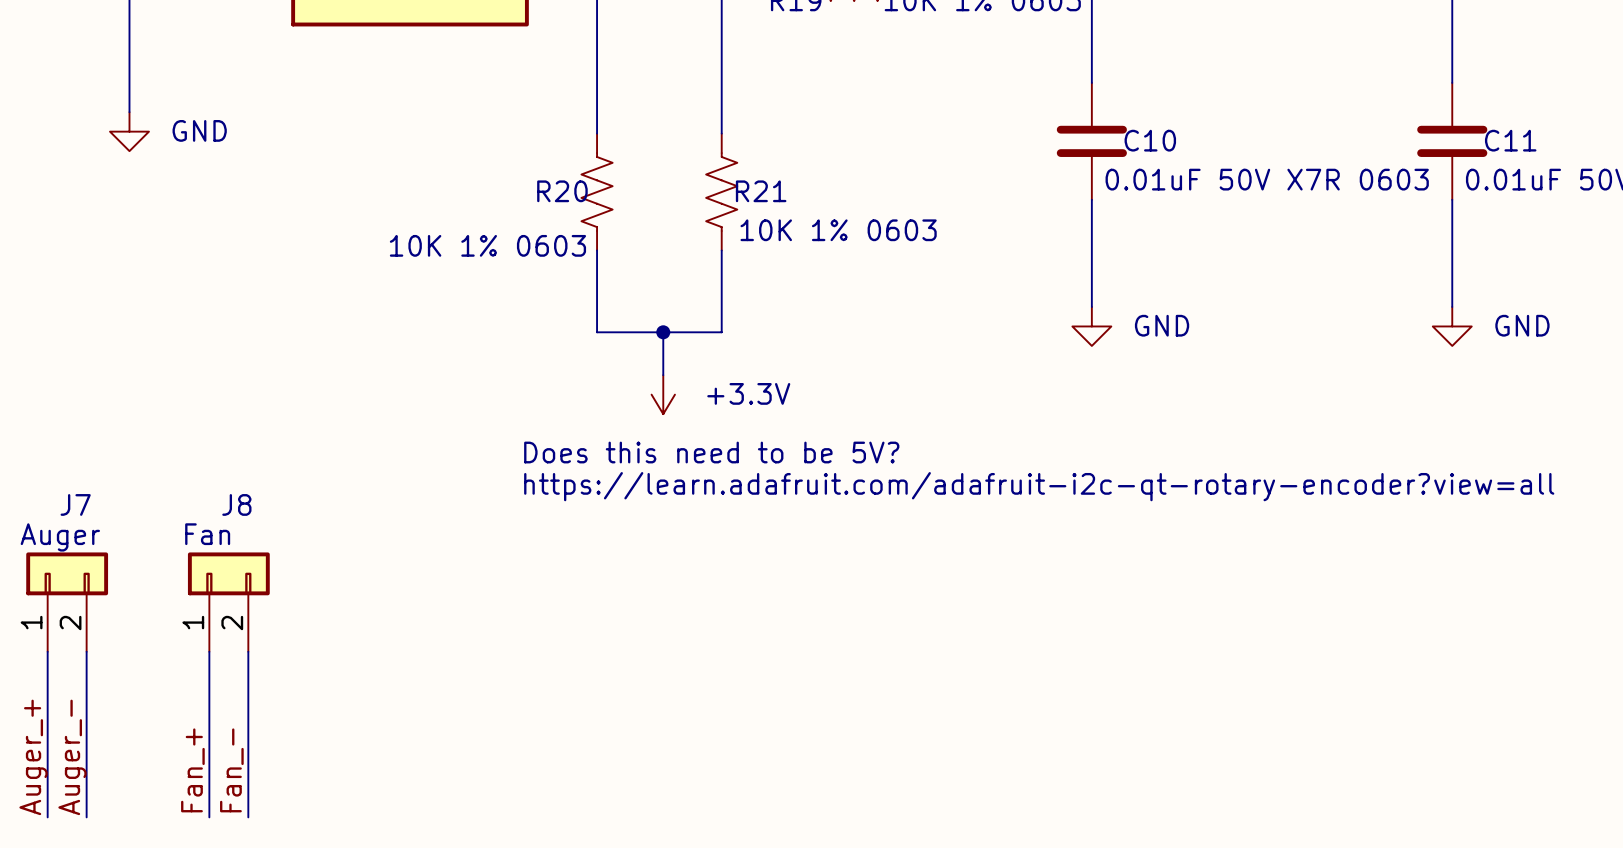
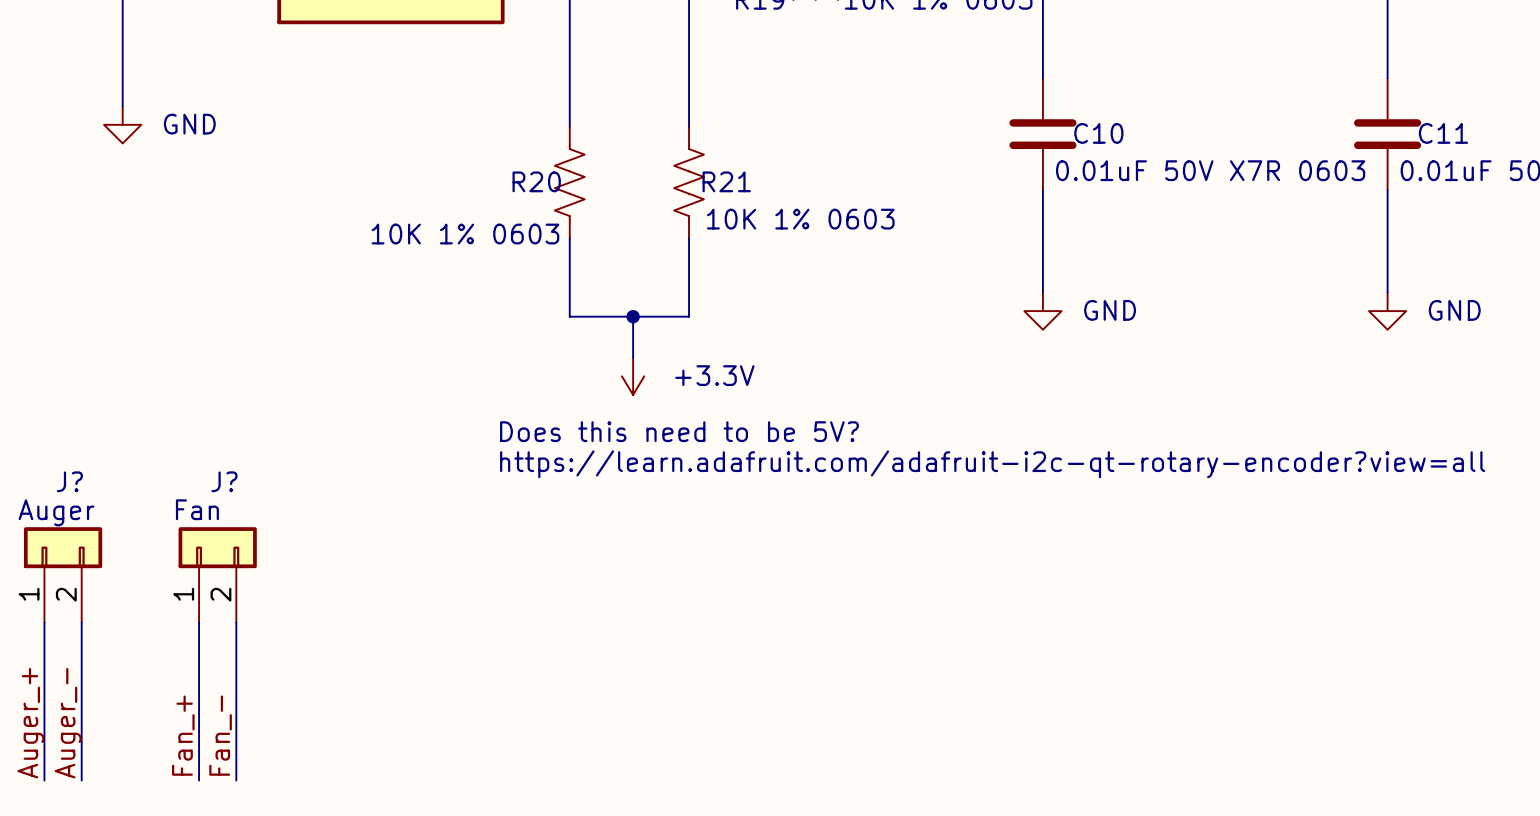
J7 name: J7 (75, 504) -> J? (69, 481)
J8 name: J8 (236, 504) -> J? (224, 481)

